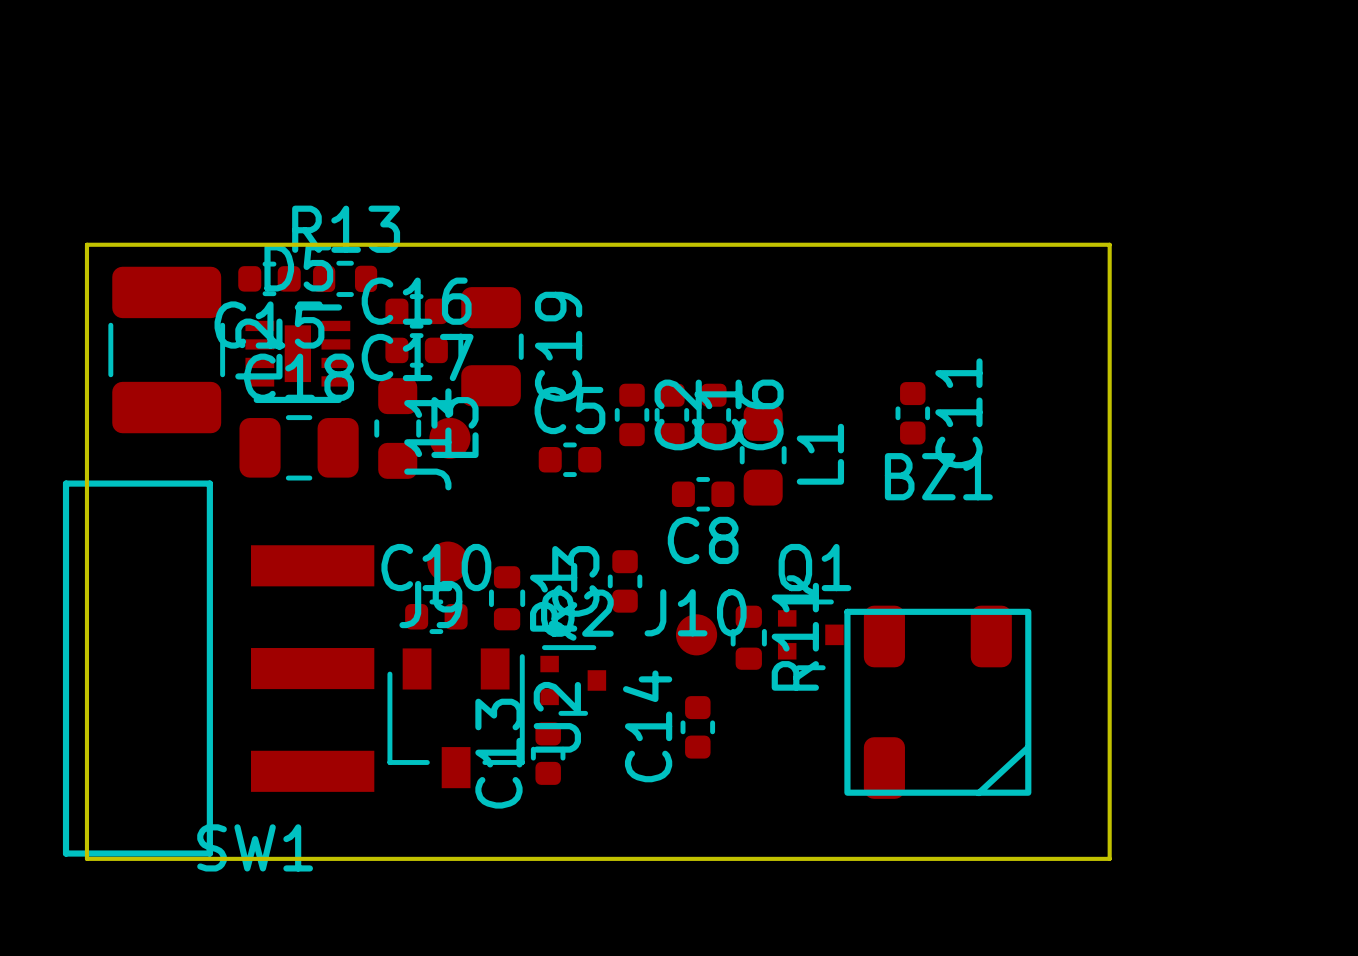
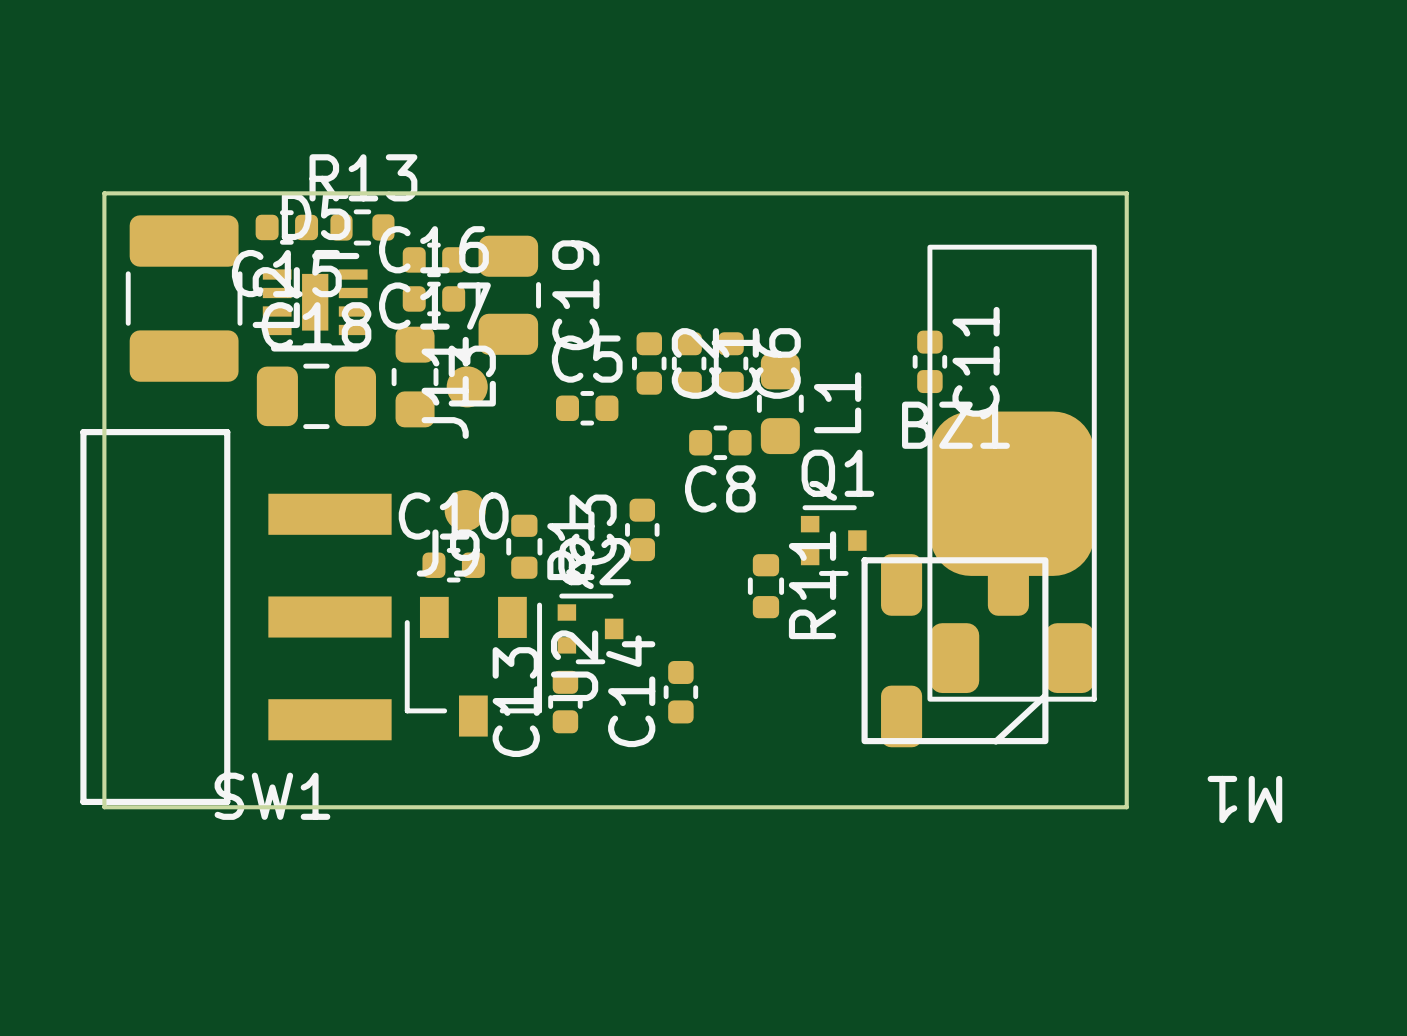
M1: none -> (1012, 473)
J10: (696, 634) -> none
Q1 position: (810, 634) -> (833, 540)
C14 position: (697, 727) -> (680, 692)

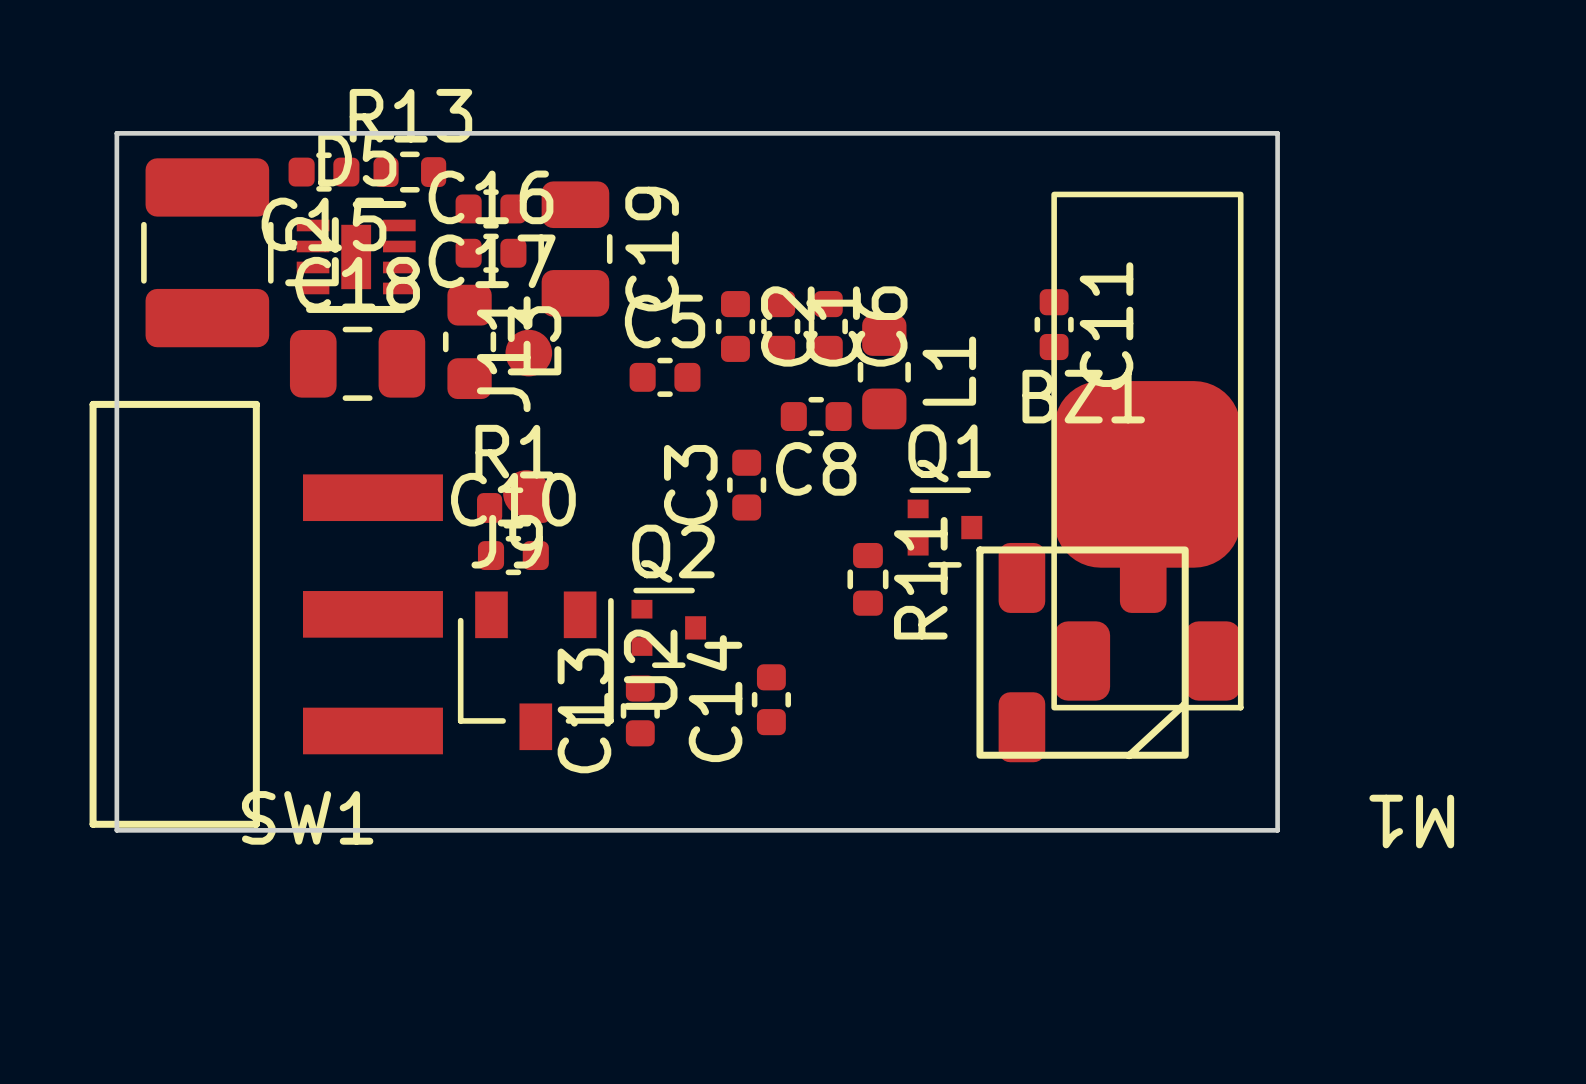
C3 position: (642, 529) -> (746, 485)
R1 rotation: 0° (524, 546) -> 90° clockwise (513, 507)
R1 position: (524, 546) -> (513, 507)

